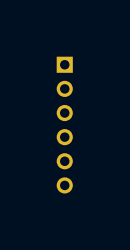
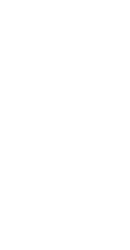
part: (64, 125) -> none

